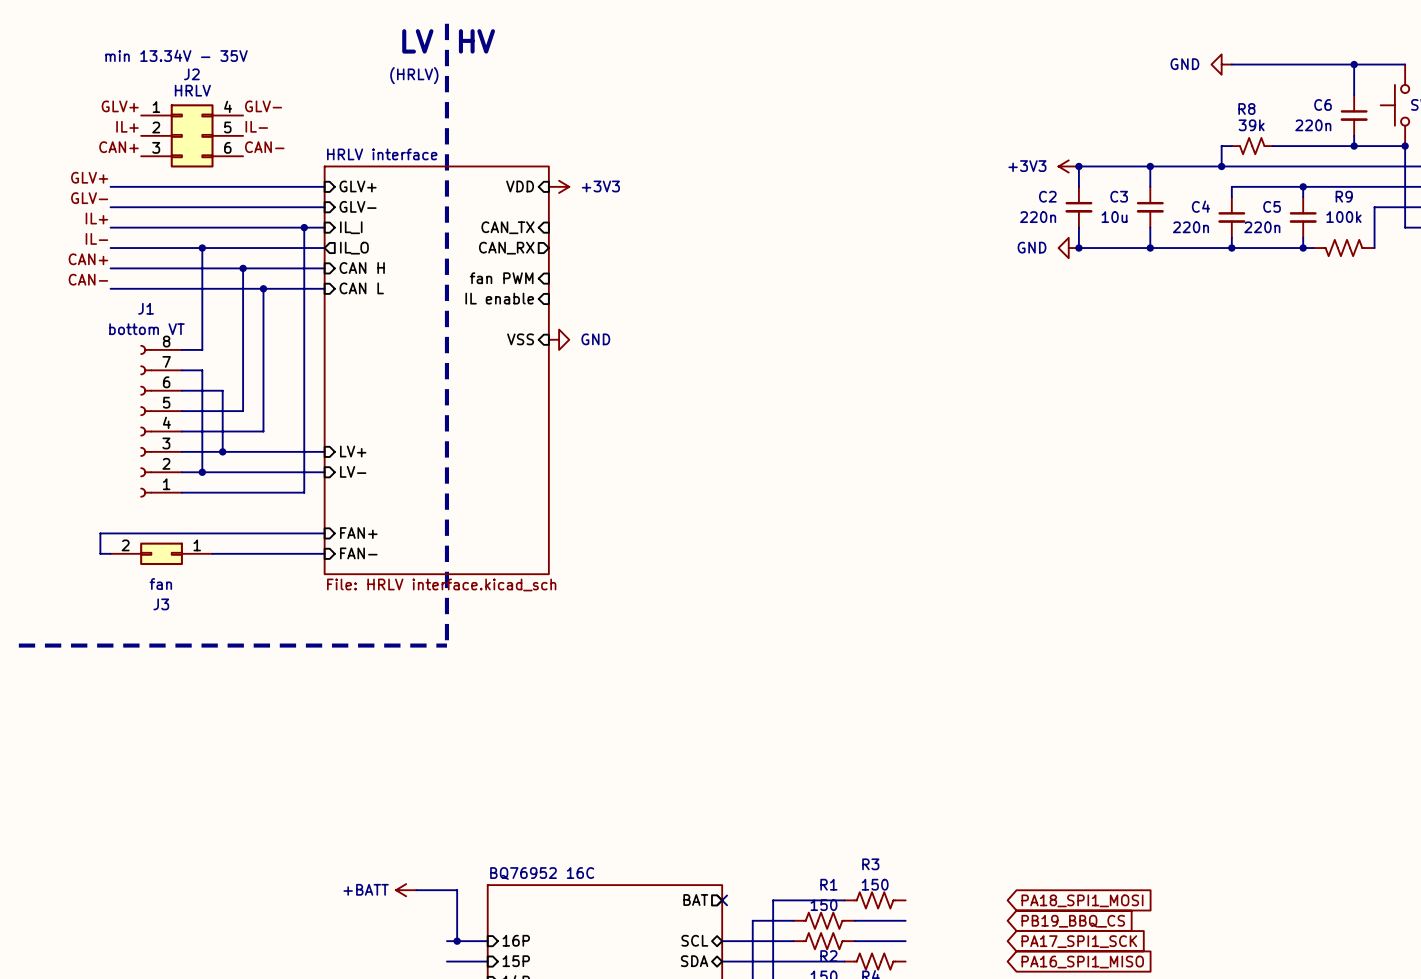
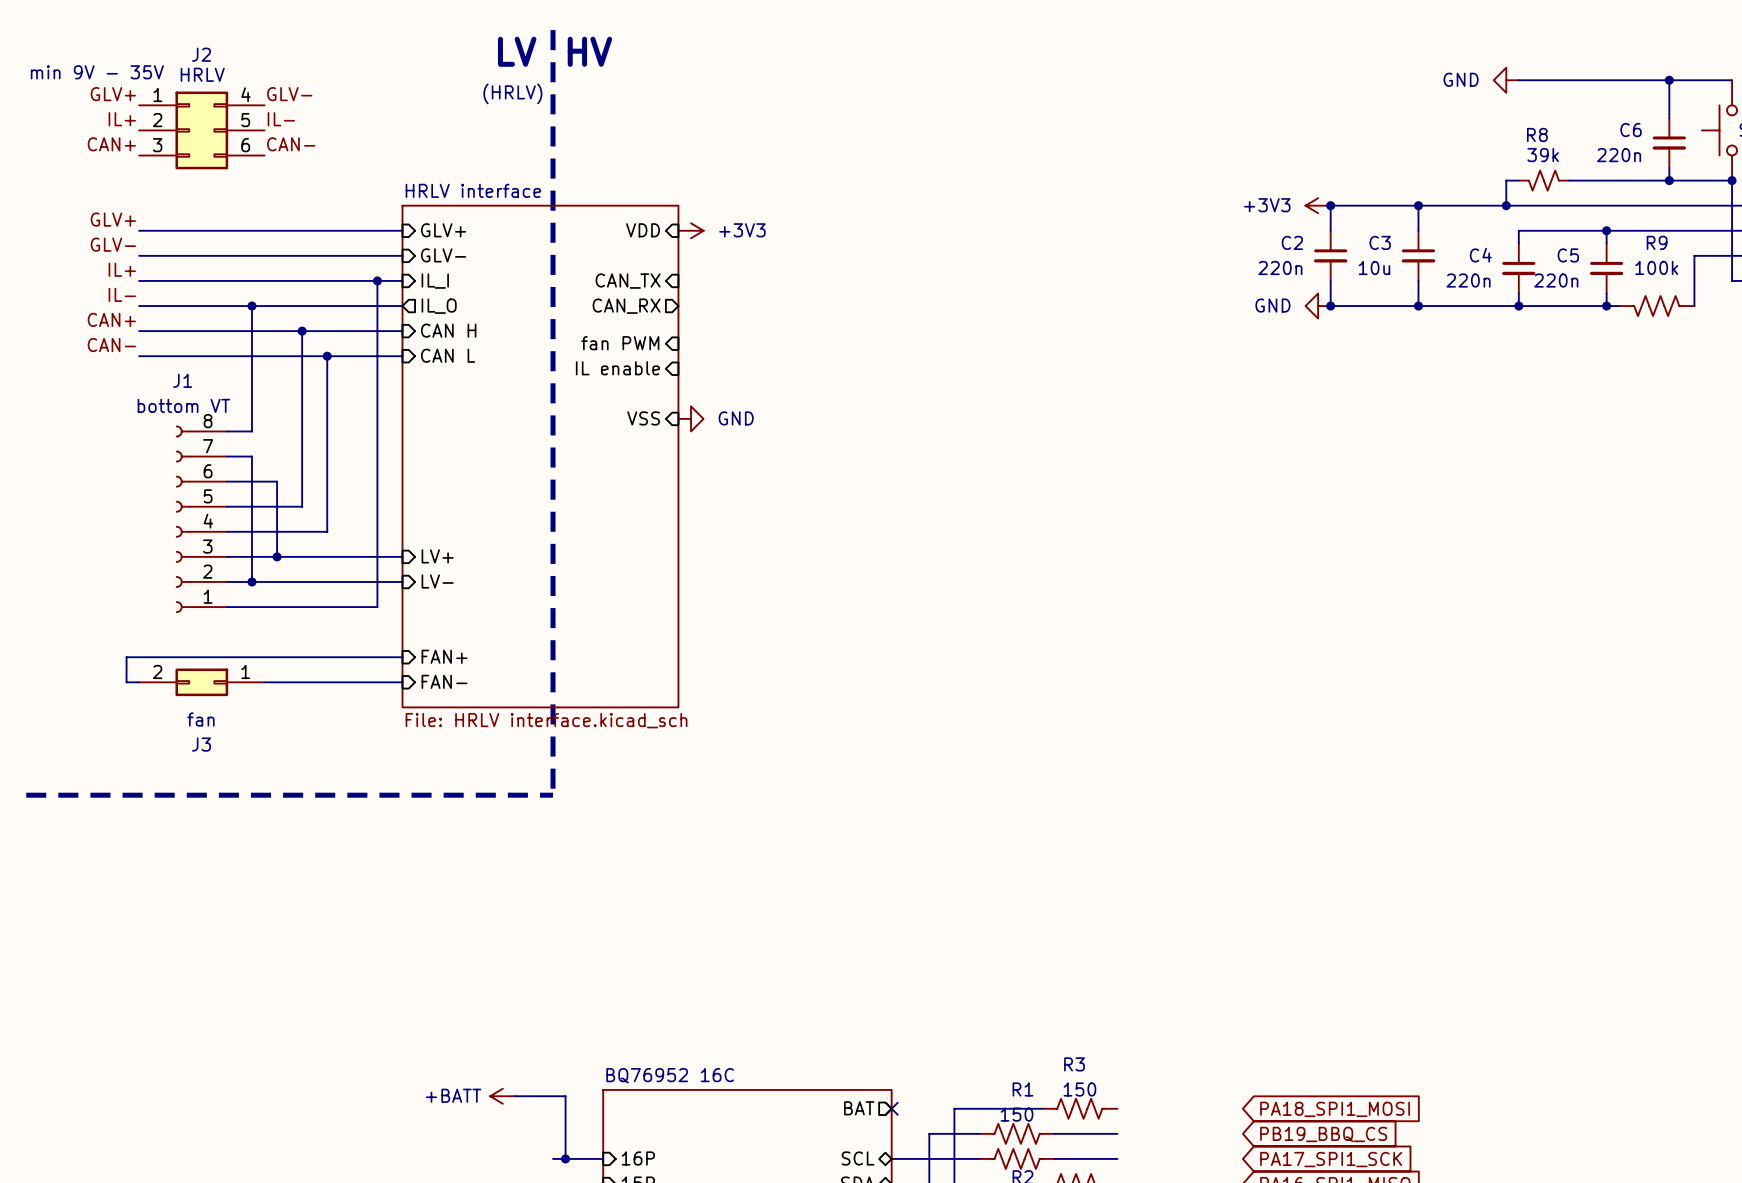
text: min 13.34V - 35V (176, 55) -> min 9V - 35V (97, 72)
label position: GLV+ (120, 106) -> GLV+ (113, 94)
label position: GLV- (263, 106) -> GLV- (289, 94)
label position: IL+ (127, 126) -> IL+ (122, 119)
label position: IL- (256, 126) -> IL- (281, 119)
J2 position: (192, 135) -> (201, 130)
label position: CAN+ (118, 147) -> CAN+ (111, 144)
label position: CAN- (264, 147) -> CAN- (291, 144)

